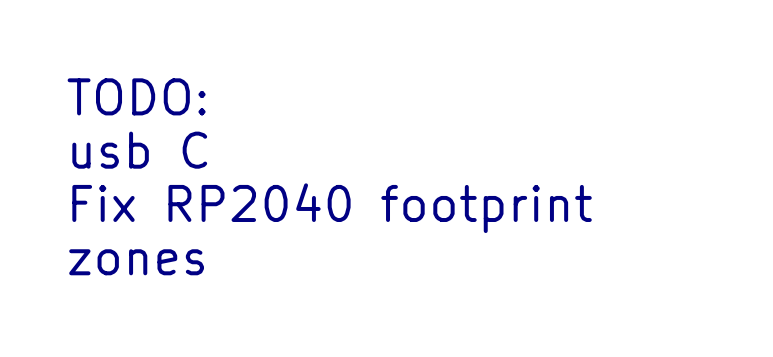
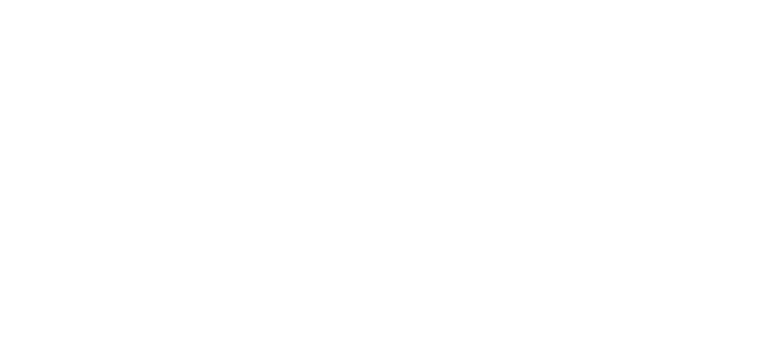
text: TODO: (136, 96) -> none
text: usb C (139, 150) -> none
text: Fix RP2040 footprint (332, 208) -> none
text: zones (136, 262) -> none

